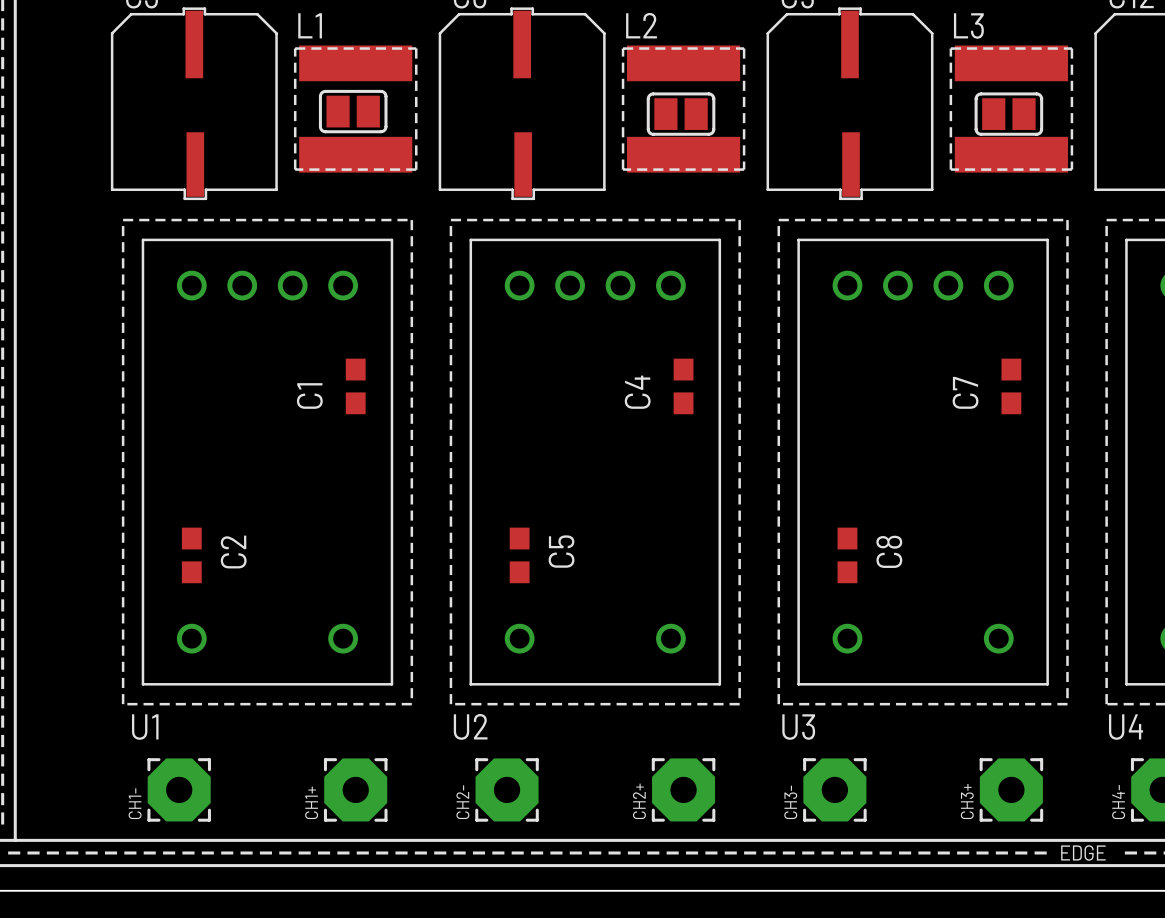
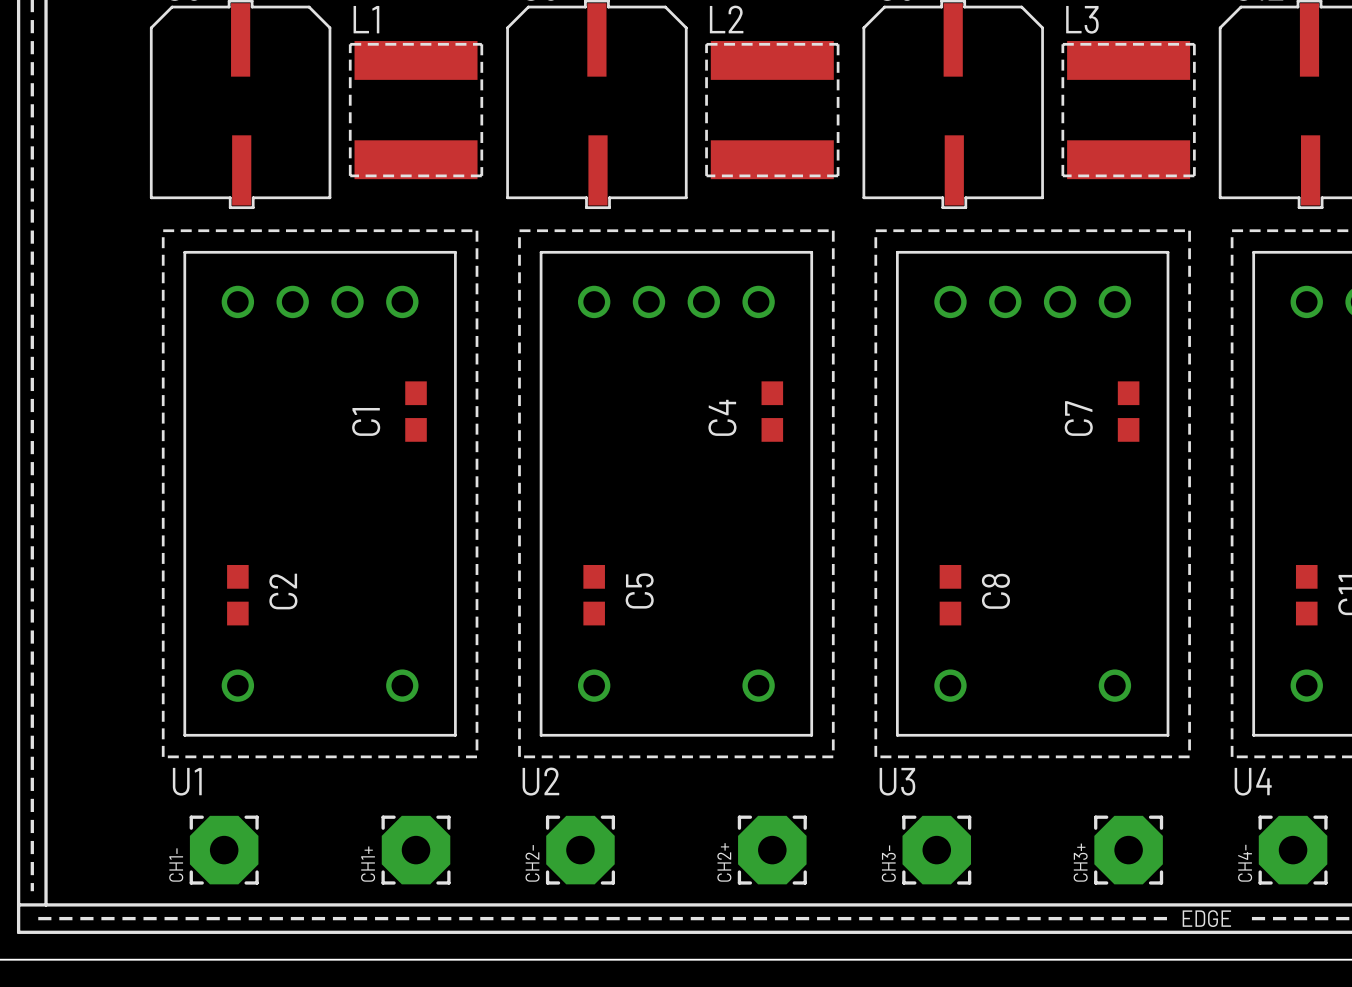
part: (353, 111) -> none
part: (681, 114) -> none
part: (1008, 114) -> none

